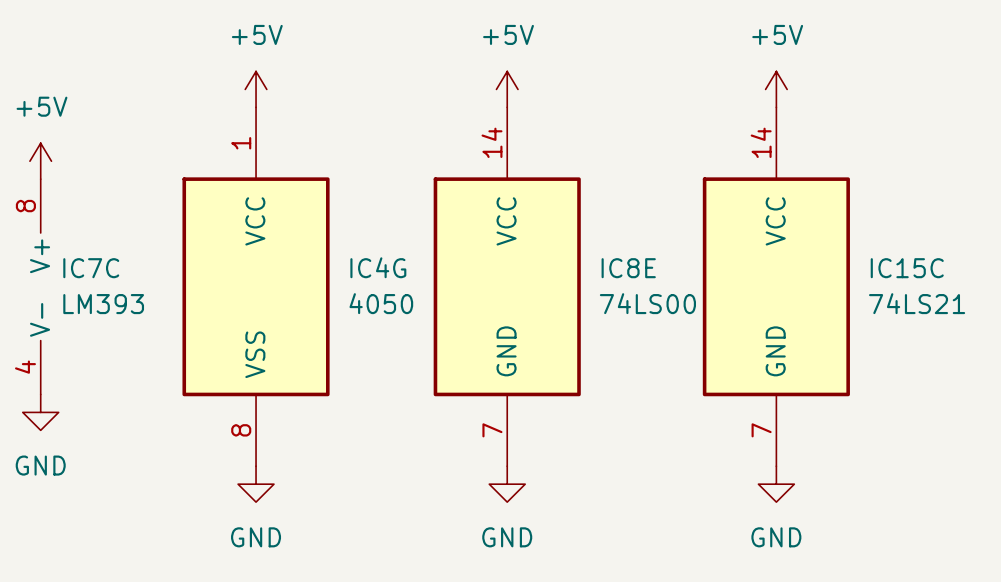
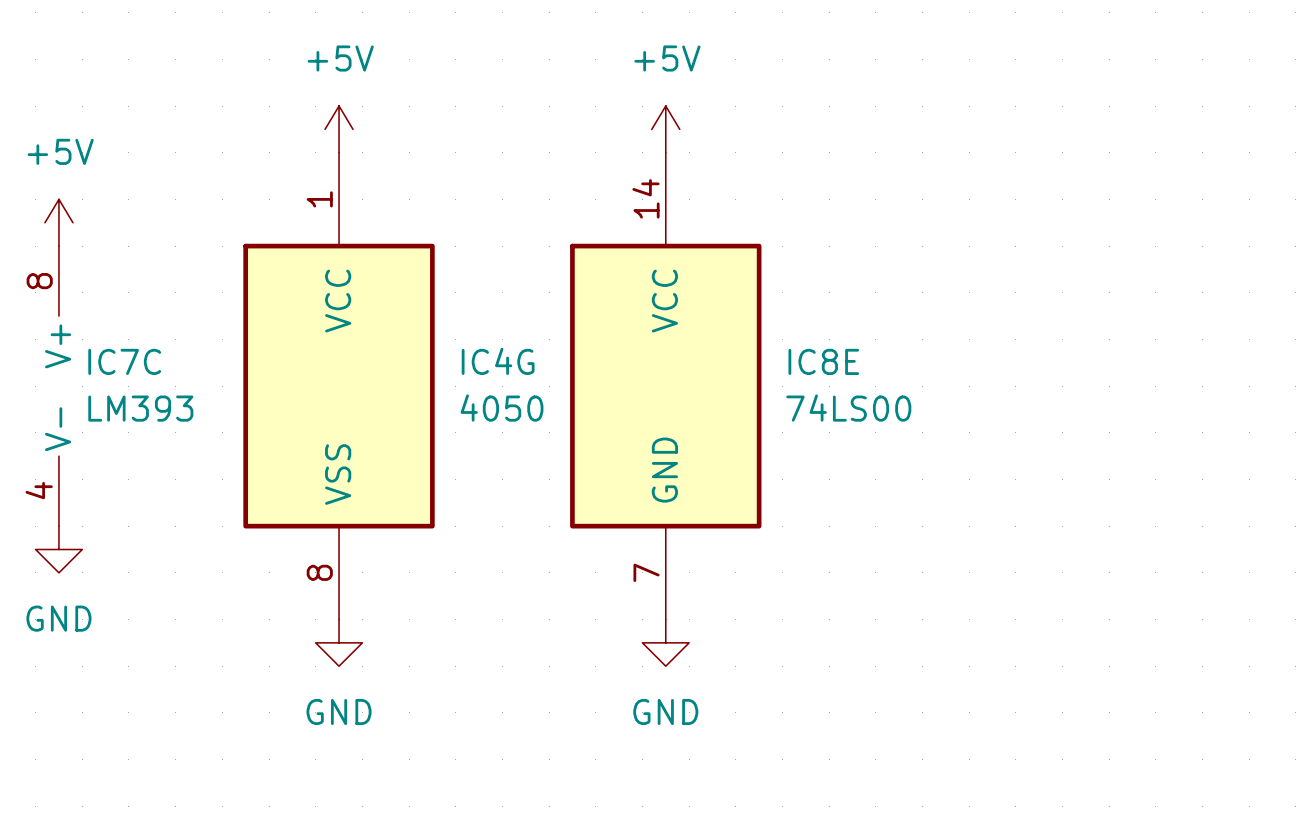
power symbol: +5V (776, 89) -> none
IC15C: 74LS21 (776, 286) -> none
power symbol: GND (776, 484) -> none

